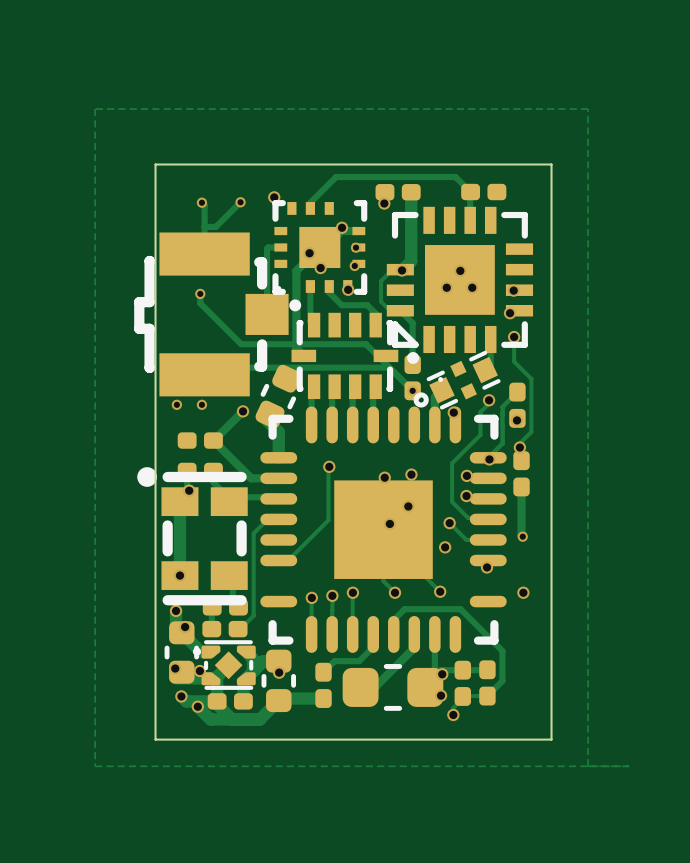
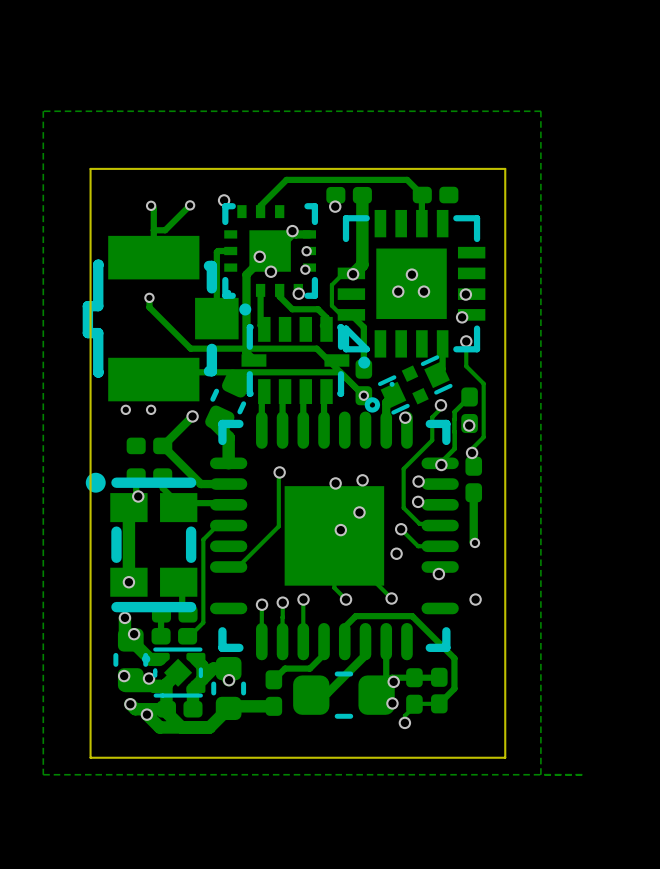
board edge: (551, 164) (155, 164) (155, 739) (551, 739) (551, 164) -> (505, 168) (505, 757) (90, 757) (90, 168) (505, 168)

